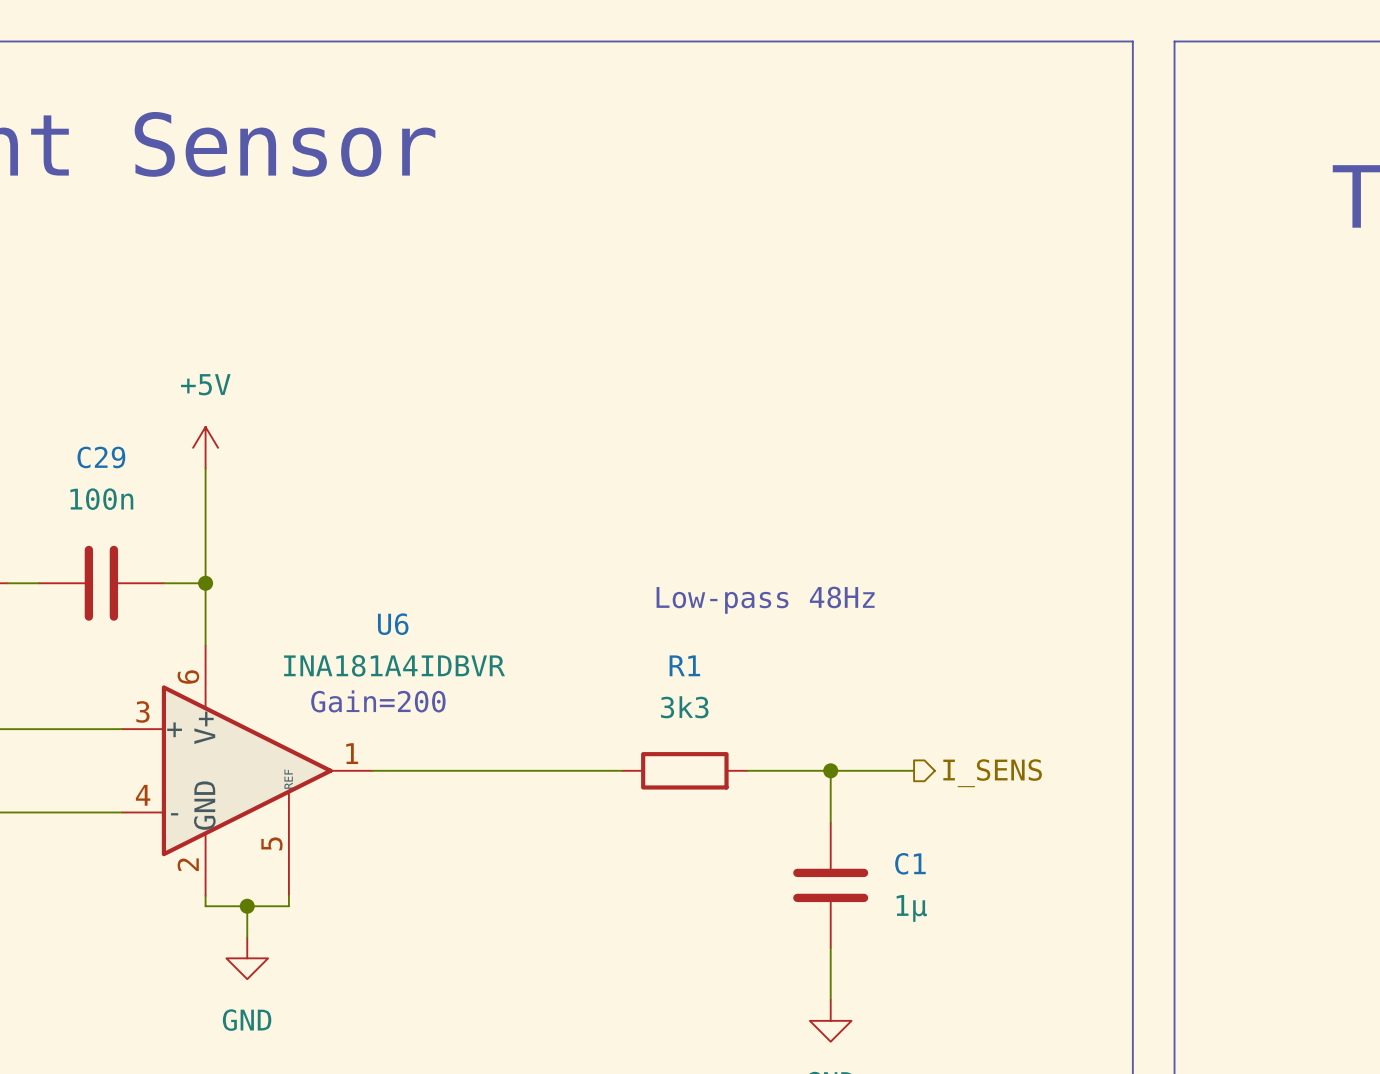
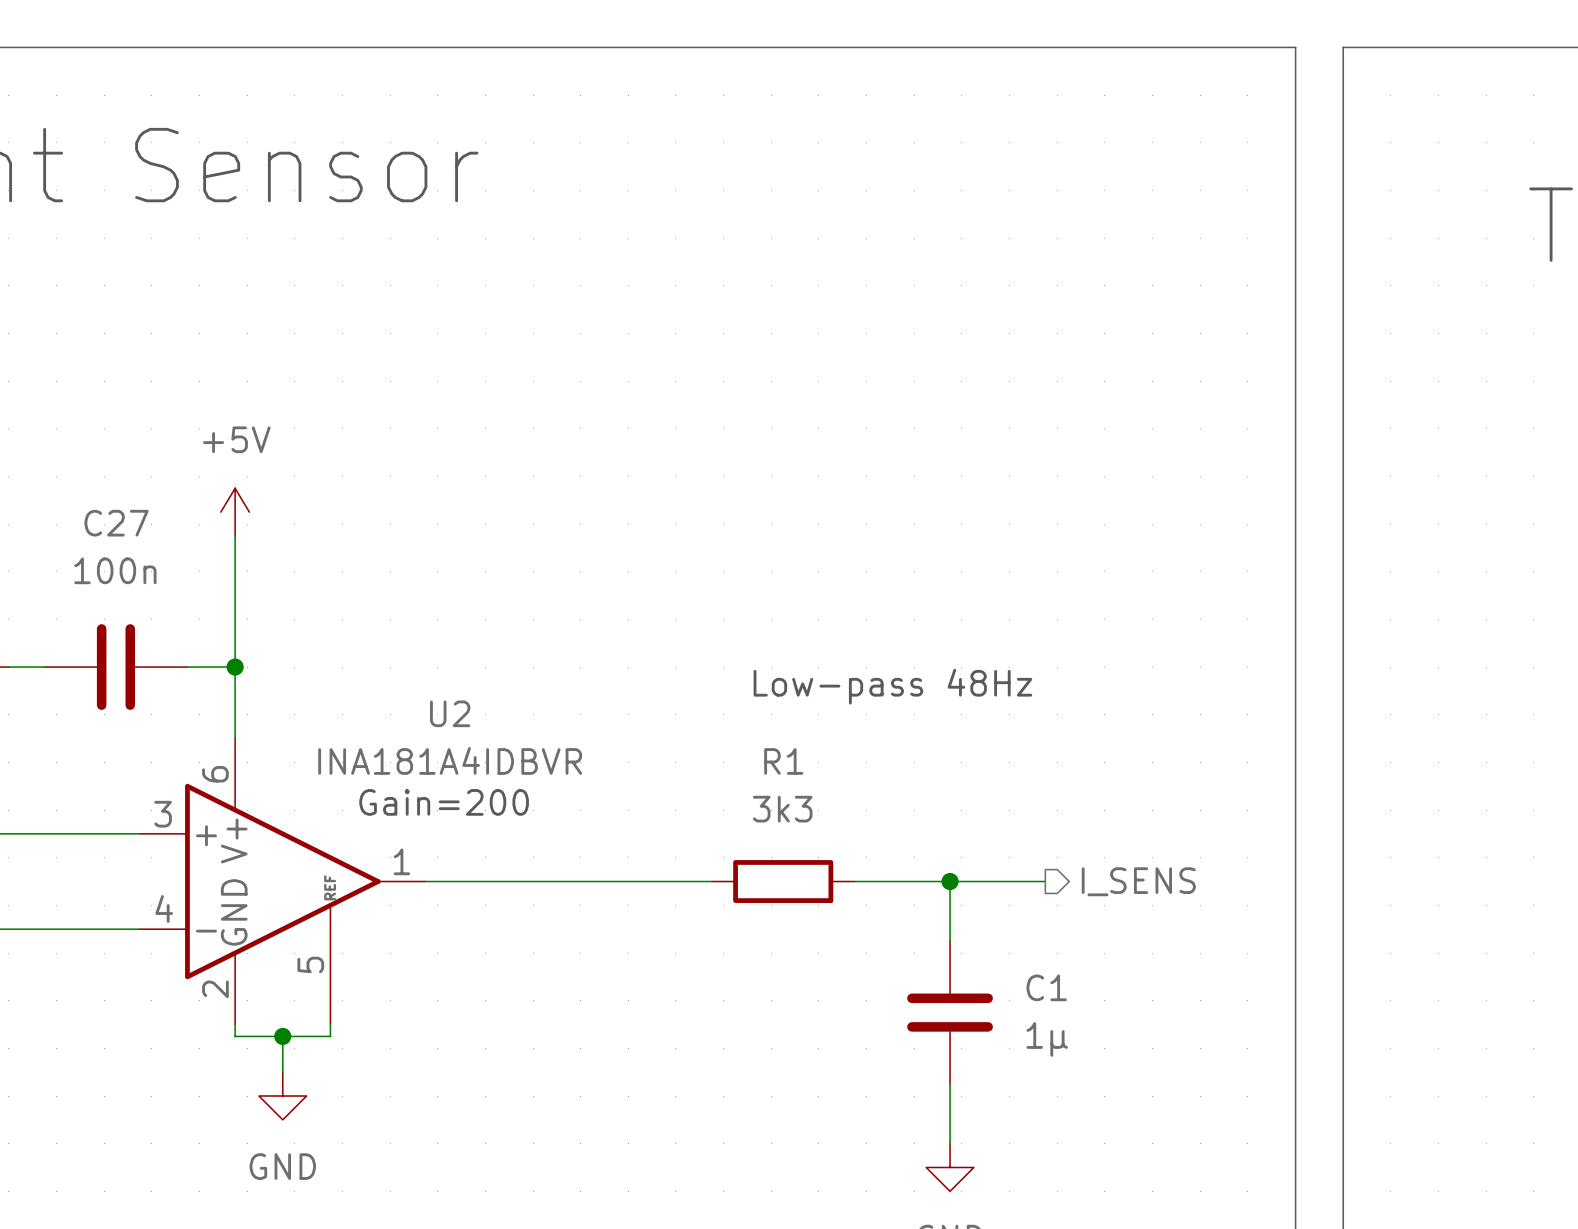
C29 name: C29 (101, 457) -> C27 (116, 523)
U6 name: U6 (393, 624) -> U2 (450, 713)

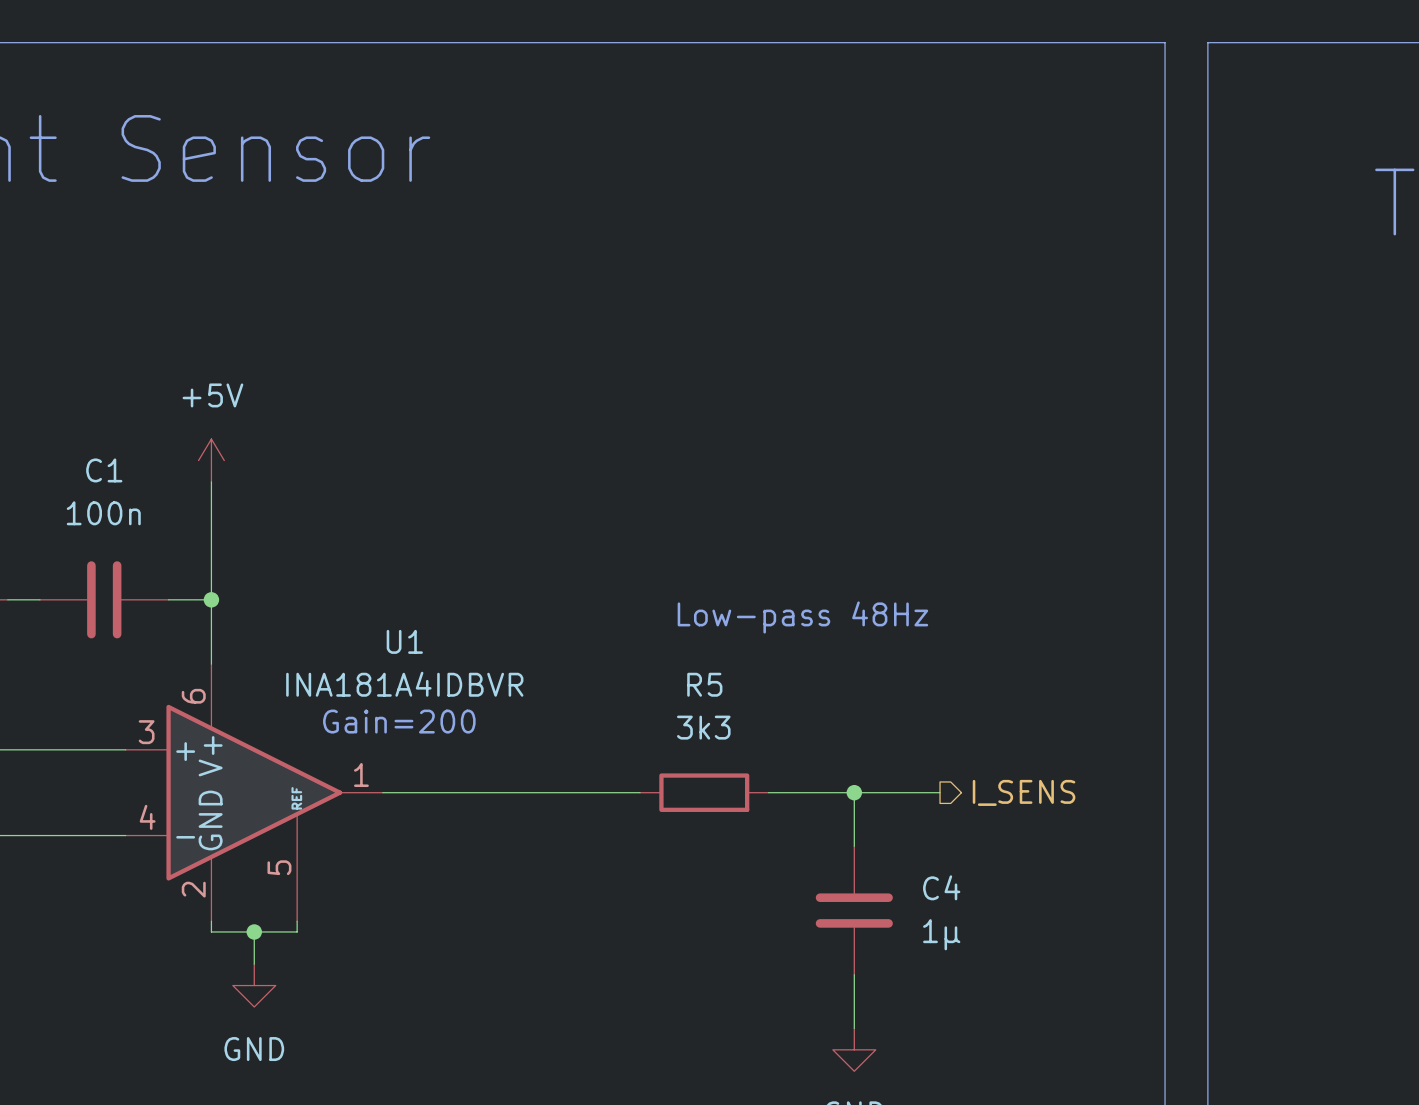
C27 name: C27 (116, 523) -> C1 (104, 470)
U2 name: U2 (450, 713) -> U1 (404, 641)
R1 name: R1 (783, 761) -> R5 (704, 684)
C1 name: C1 (1046, 987) -> C4 (941, 887)

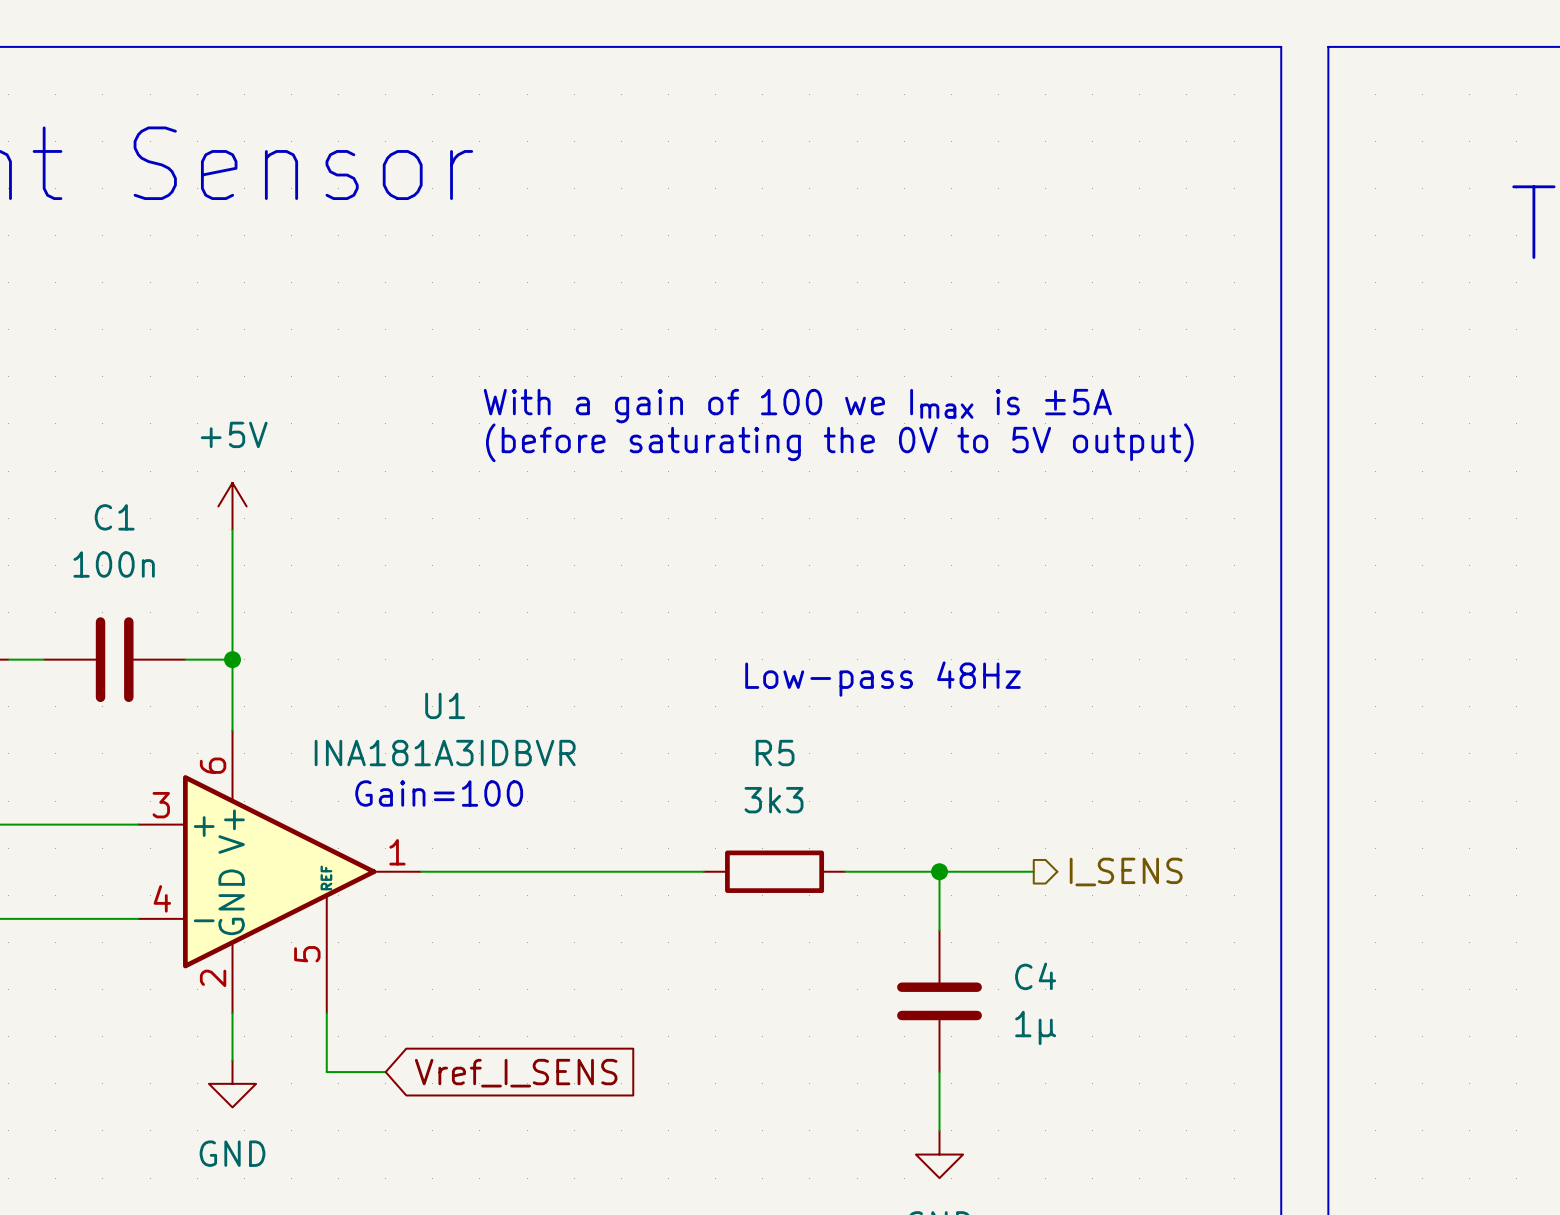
text: none -> With a gain of 100 we Imax is ±5A (797, 406)
text: none -> (before saturating the 0V to 5V output) (839, 442)
U1 value: INA181A4IDBVR (404, 684) -> INA181A3IDBVR (445, 753)
text: Gain=200 (399, 721) -> Gain=100 (439, 793)
wire: (211, 931) (297, 931) -> (232, 1024) (232, 1060)
wire: (254, 931) (254, 964) -> none
junction: (254, 931) -> none
wire: none -> (326, 1024) (326, 1072) (385, 1072)
global label: none -> Vref_I_SENS (516, 1073)
power symbol position: GND (254, 985) -> GND (232, 1083)

